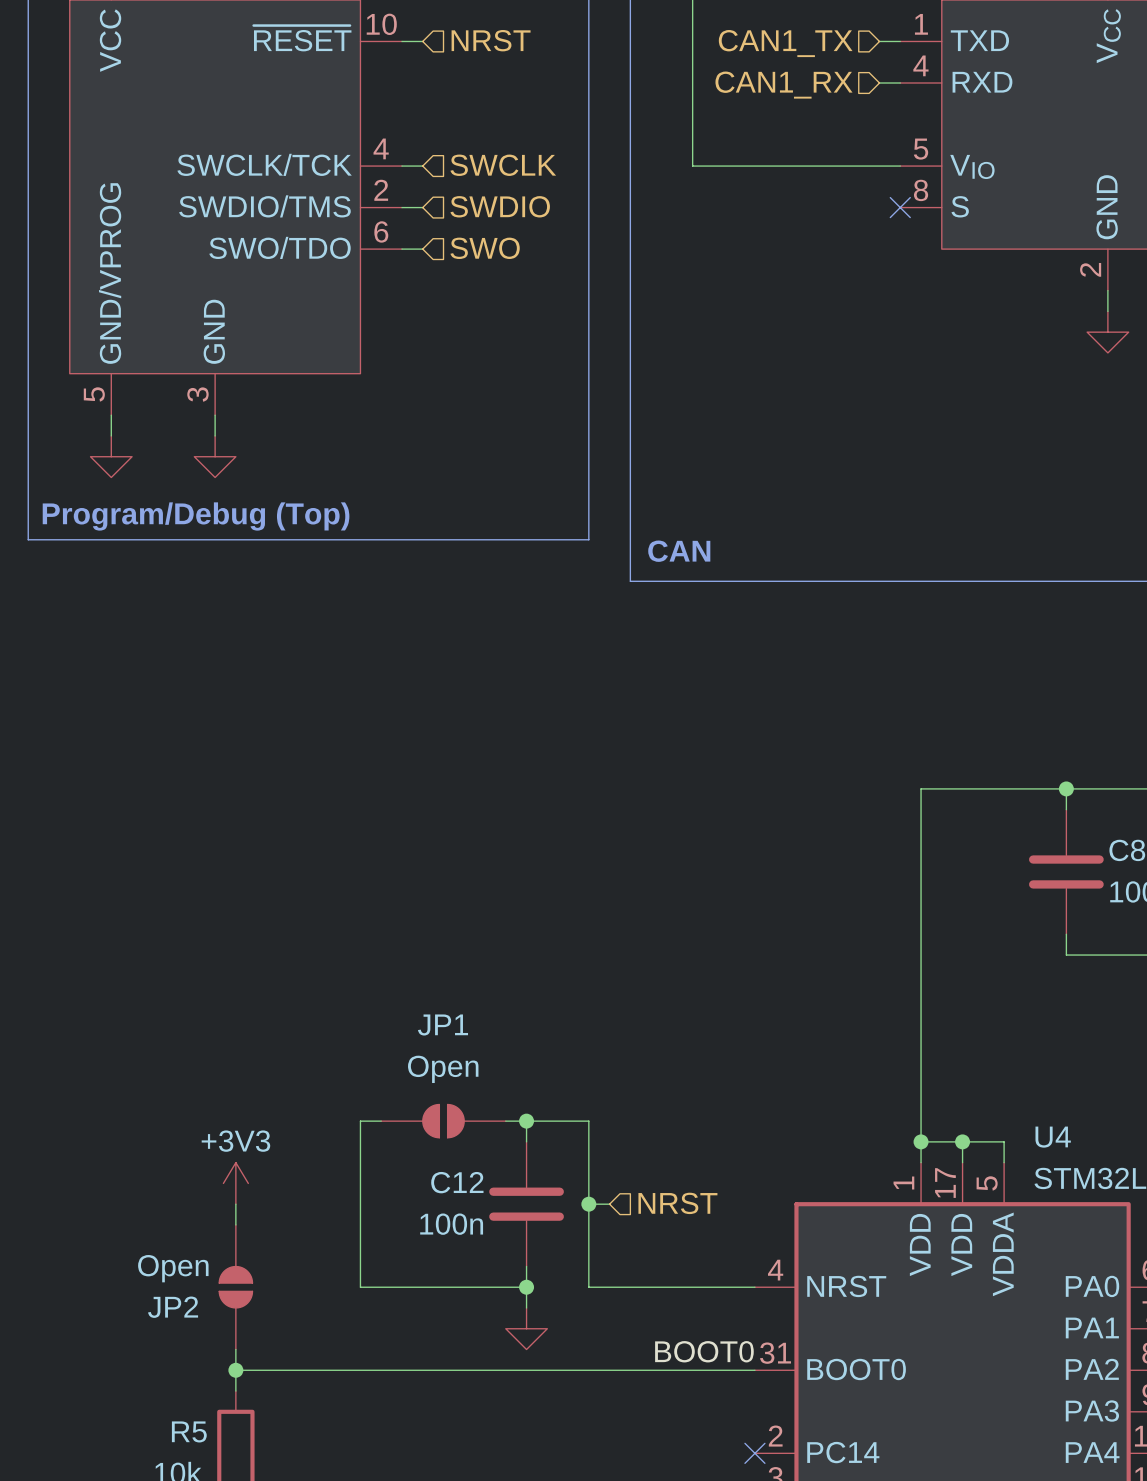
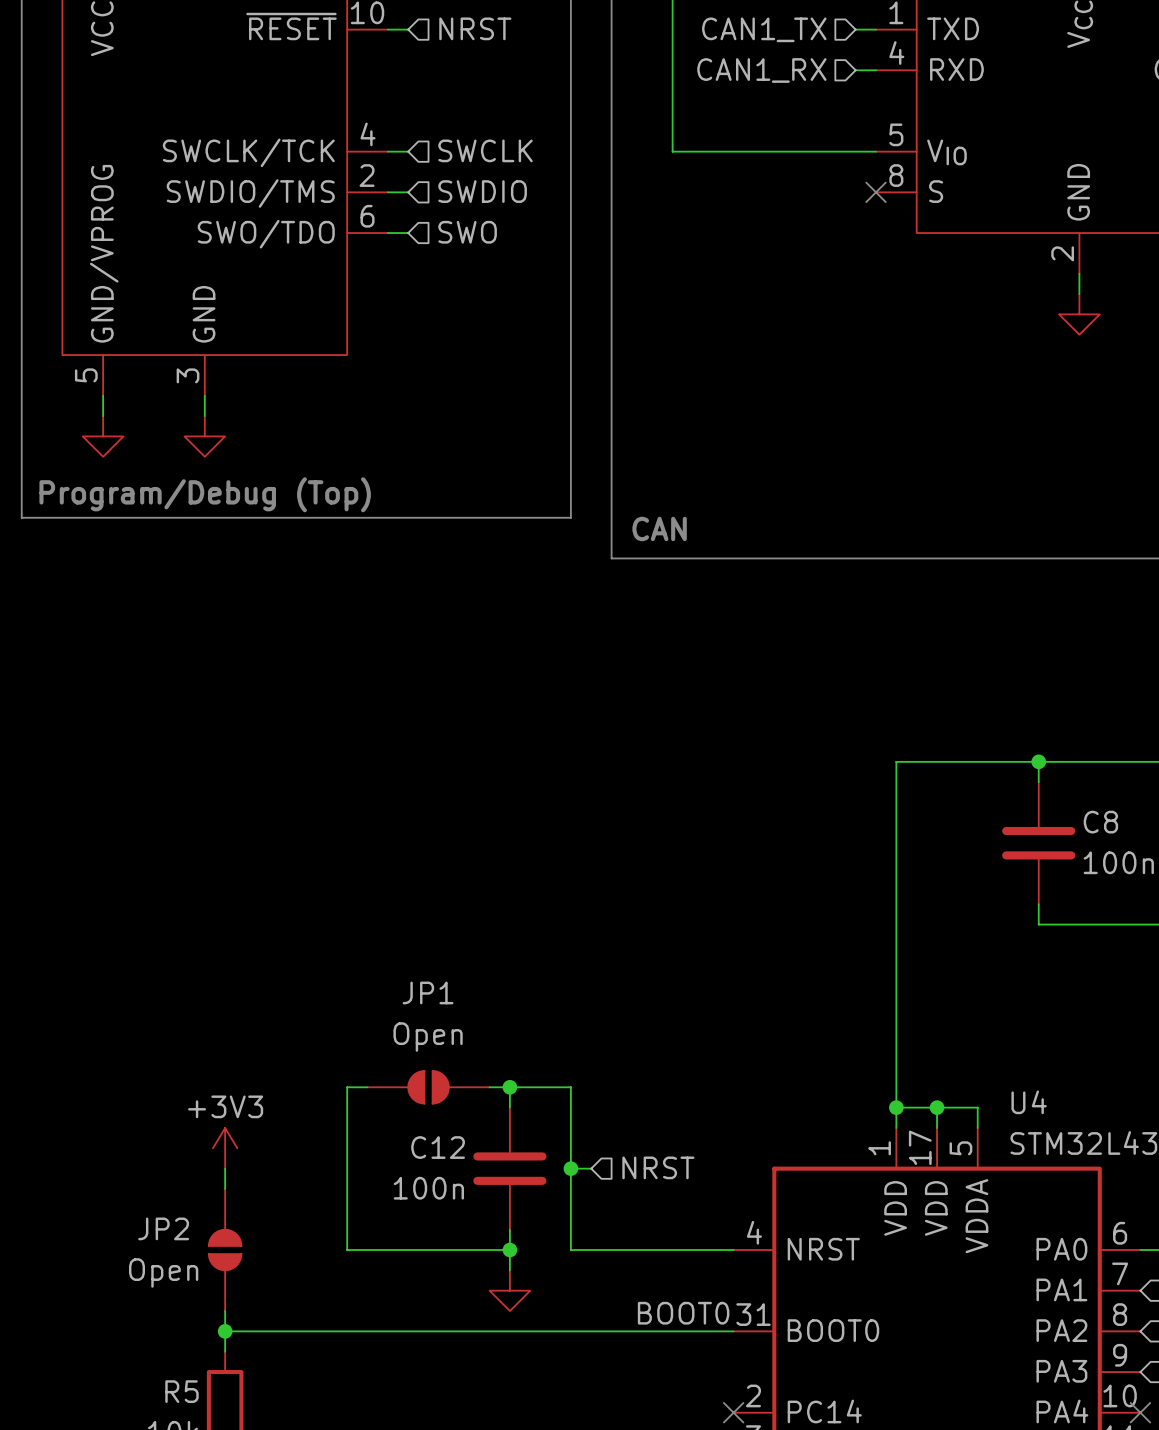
JP2 value position: Open (173, 1268) -> Open (163, 1272)
JP2 name position: JP2 (173, 1307) -> JP2 (163, 1228)

